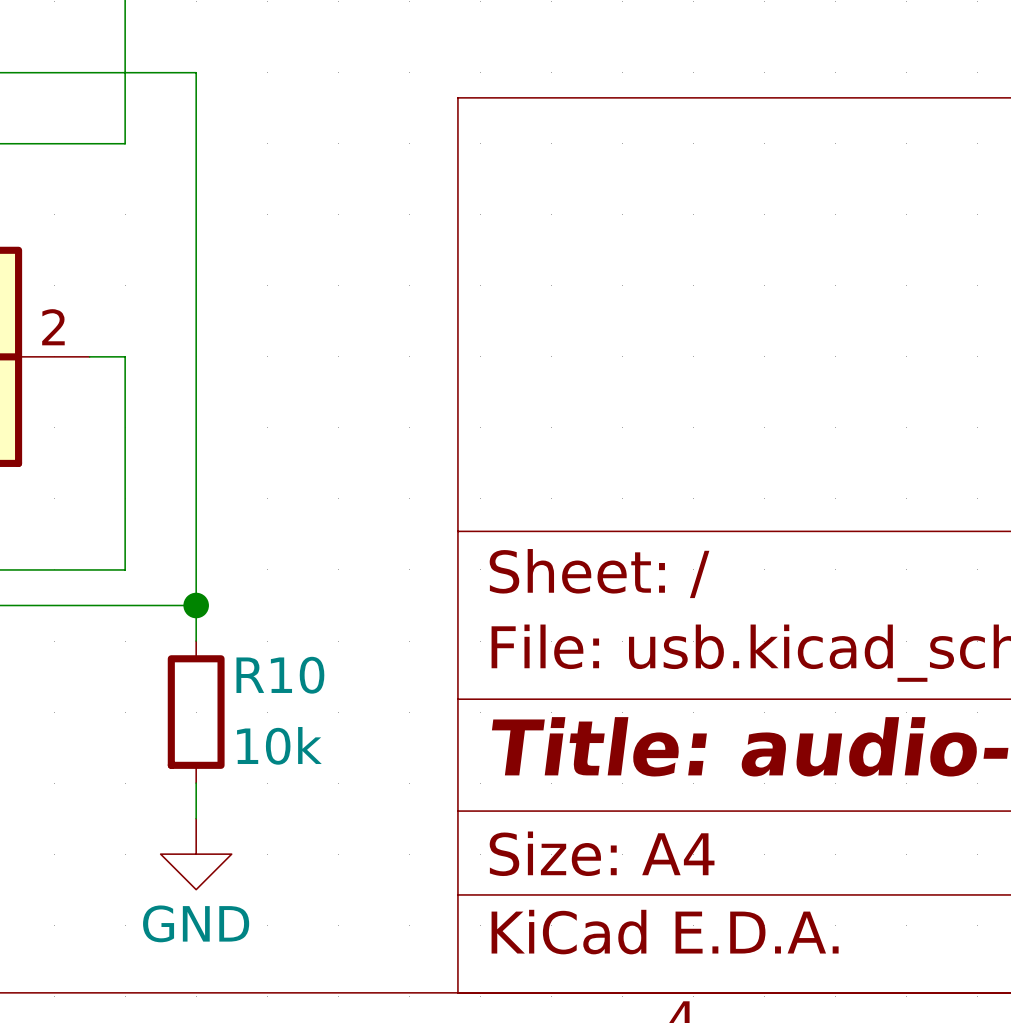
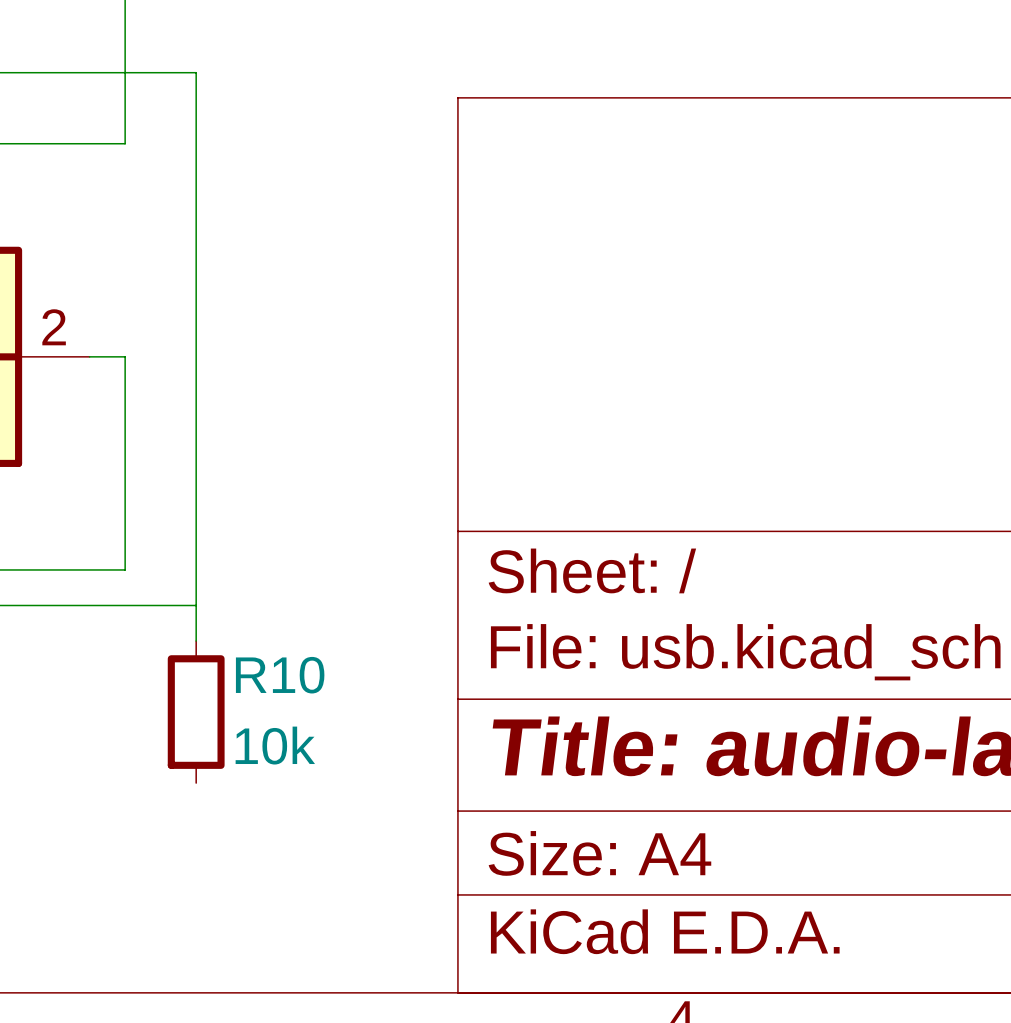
junction: (196, 605) -> none
wire: (196, 783) (196, 818) -> none
power symbol: GND (196, 854) -> none

